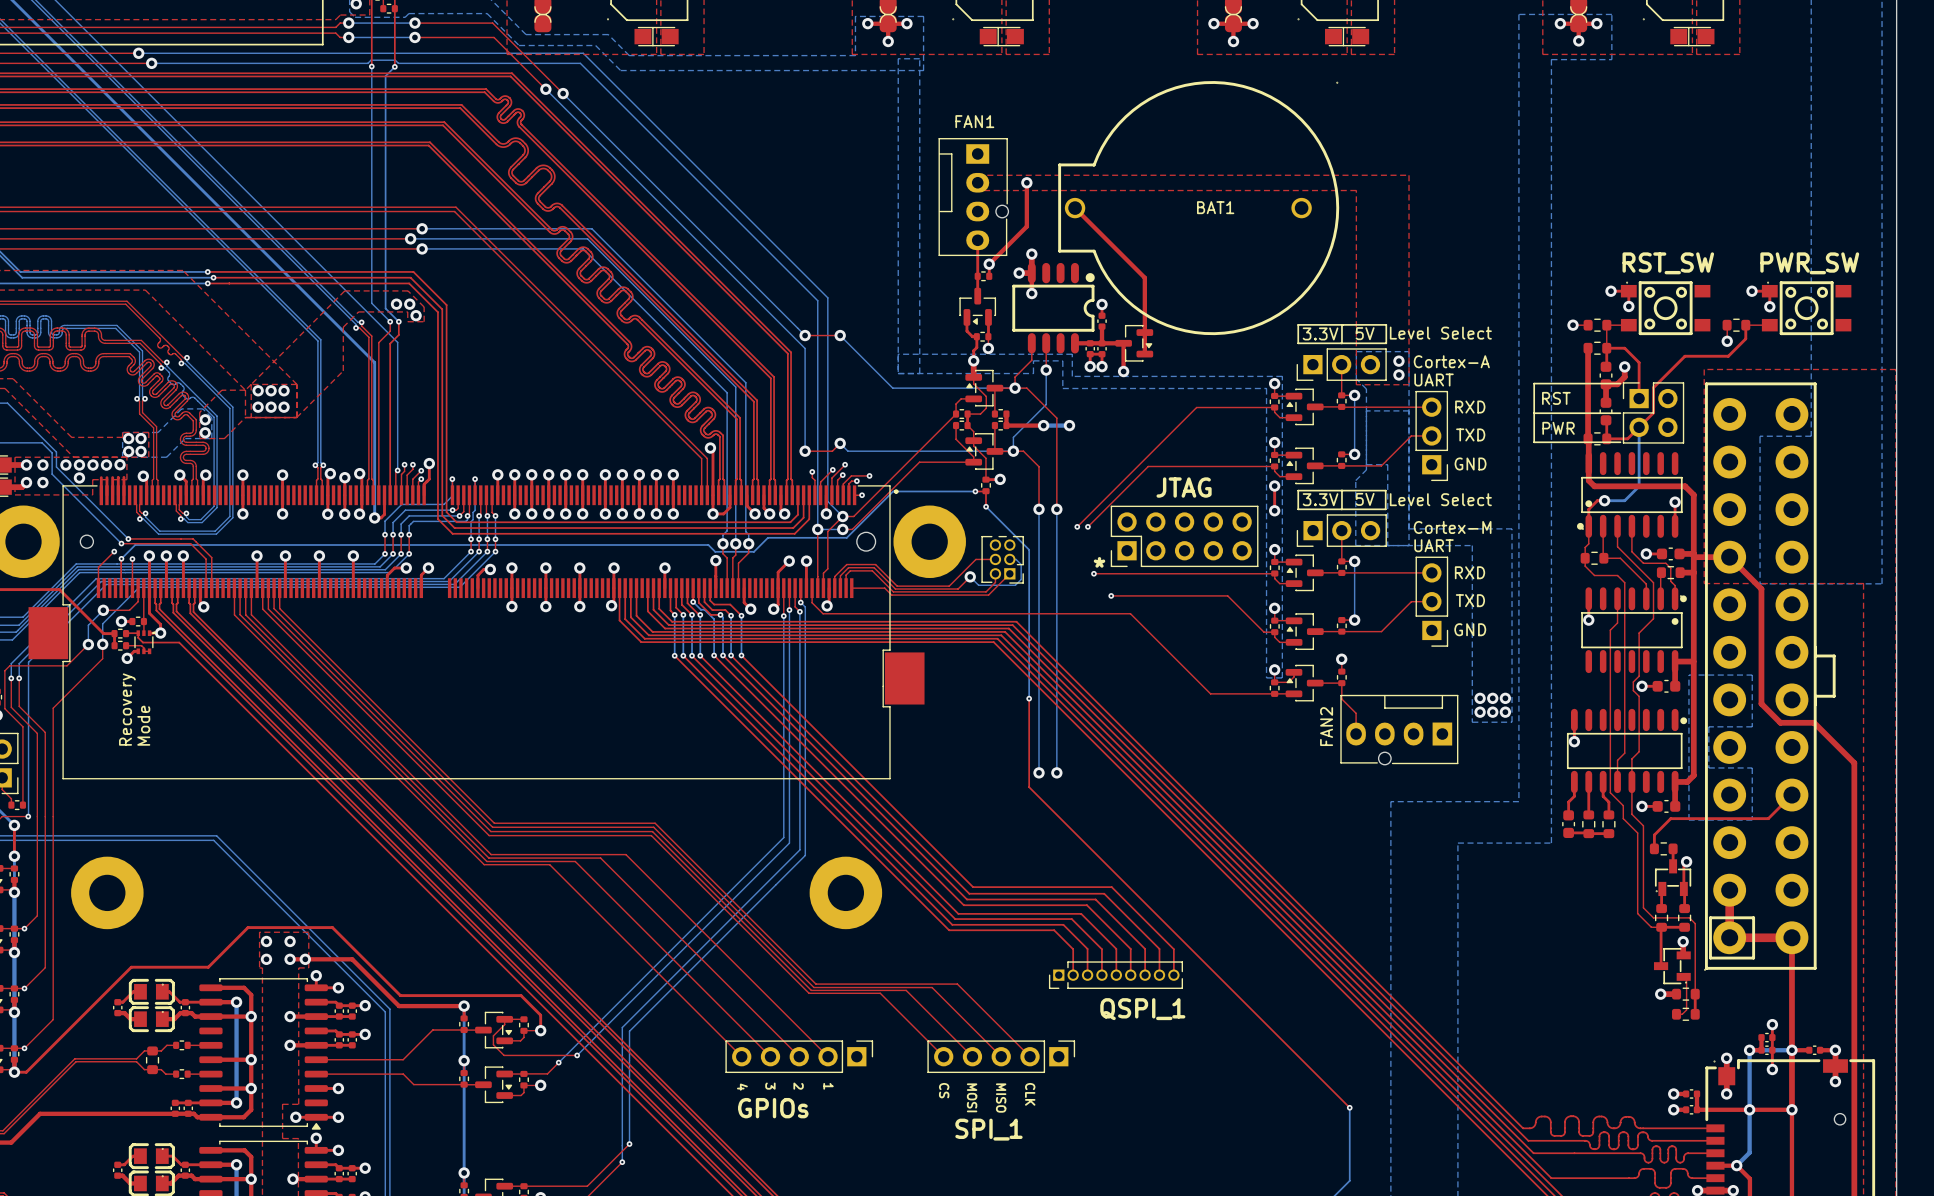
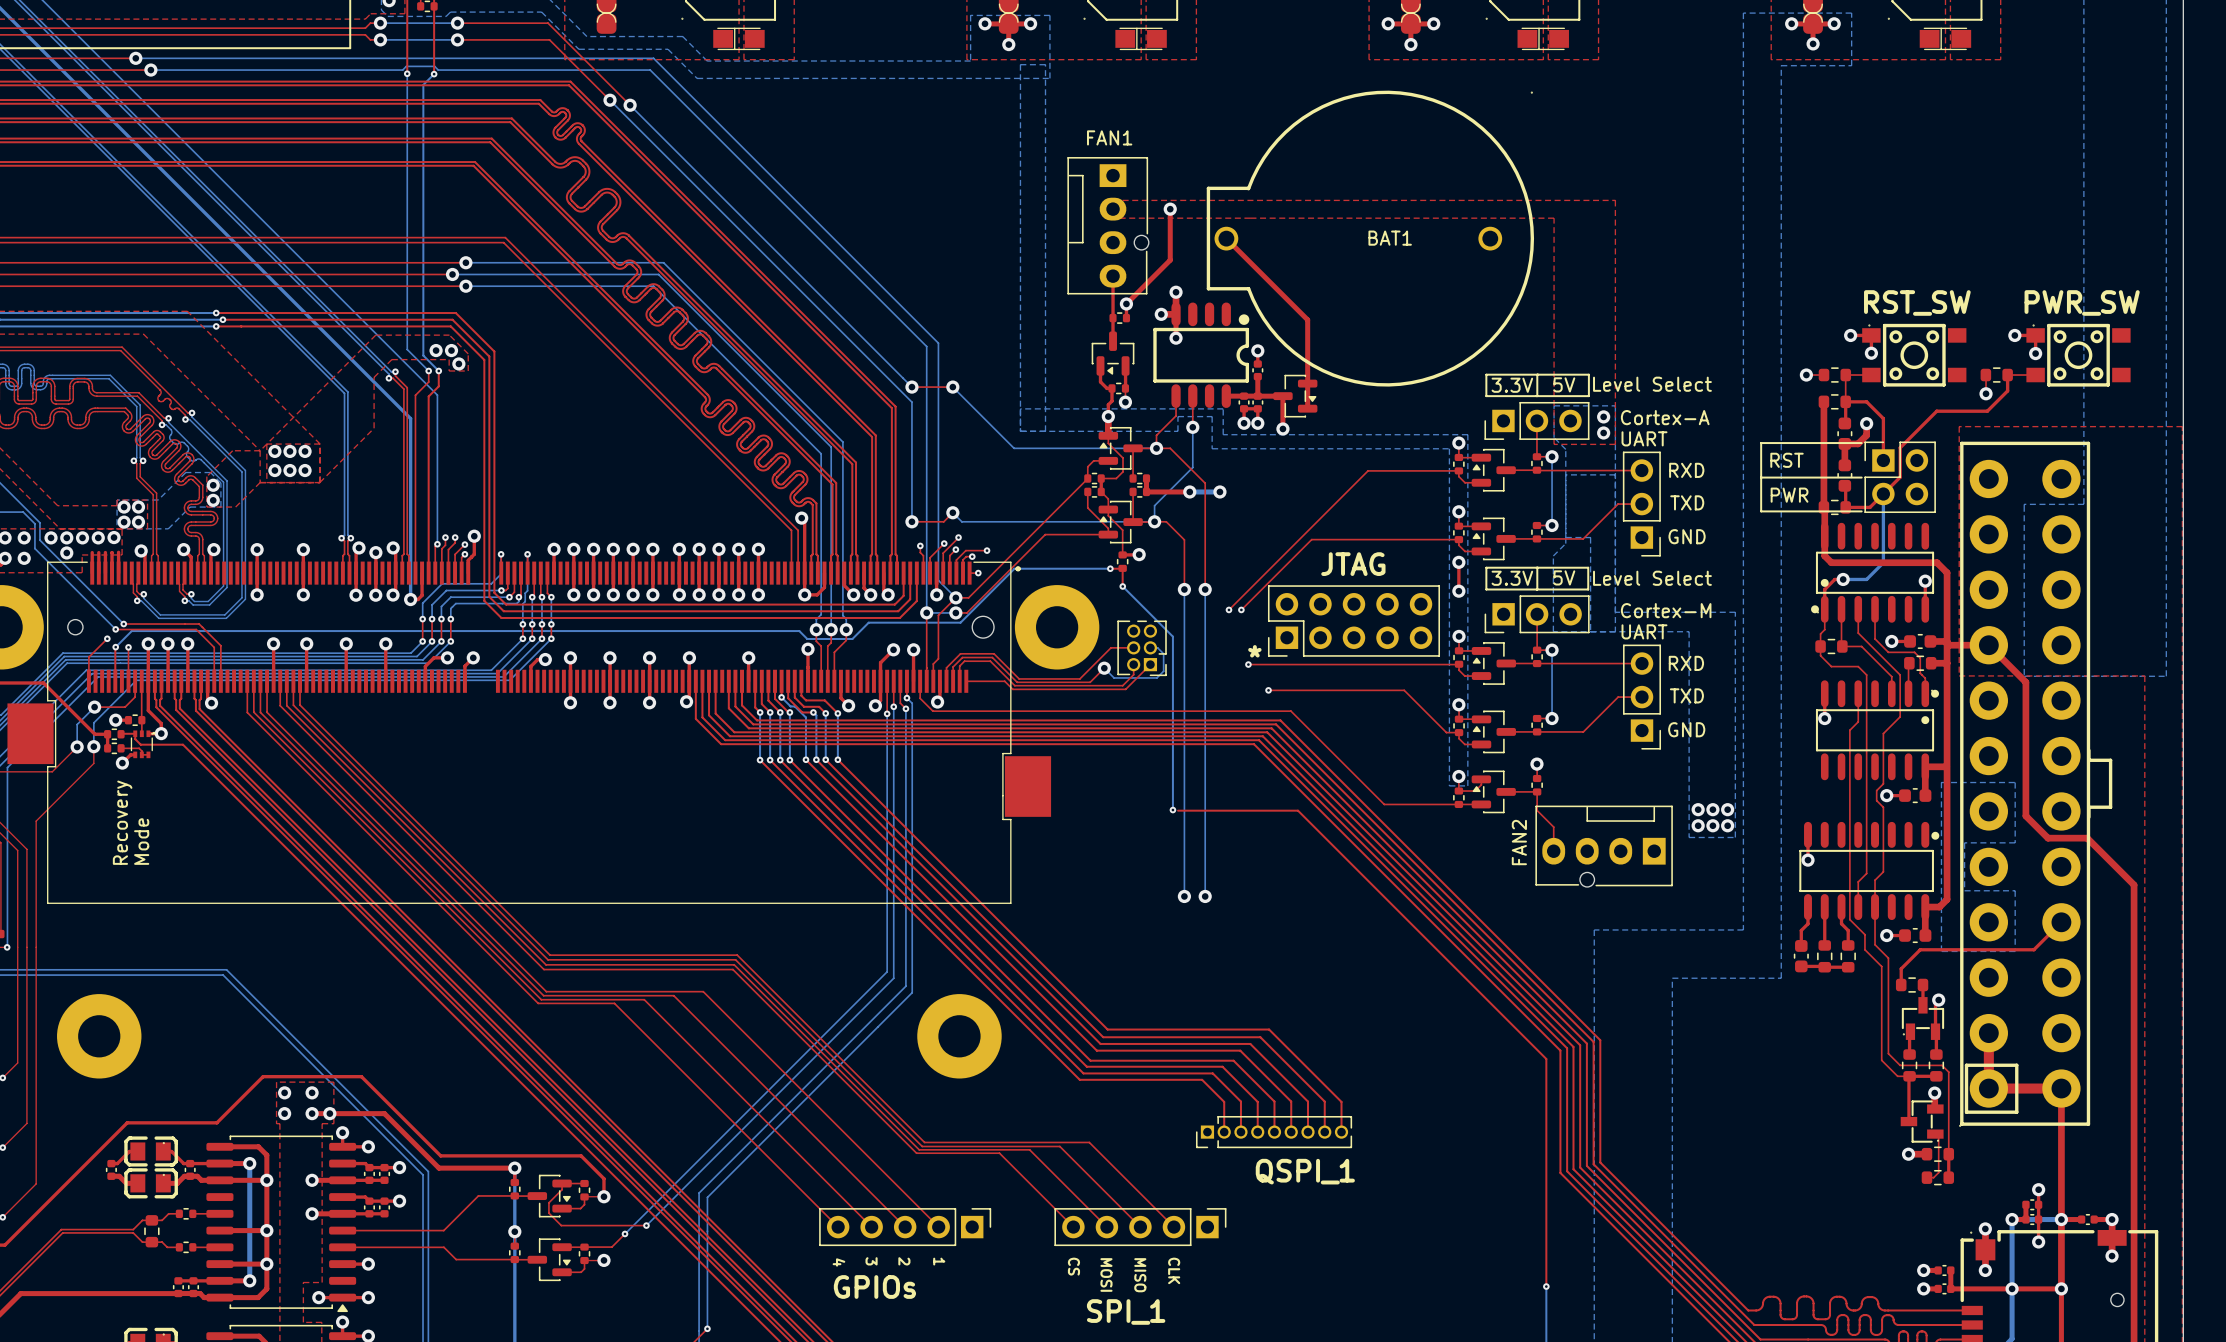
top track: (1016, 621) (1396, 1001) -> (1158, 720) (1280, 720) (1600, 1040) (1600, 1162)
top track: (1012, 625) (1390, 1002) -> (1153, 724) (1276, 724) (1593, 1041) (1593, 1164)
top track: (1008, 628) (1384, 1004) -> (1149, 728) (1271, 728) (1586, 1043) (1586, 1165)
top track: (1005, 631) (1378, 1005) -> (1144, 732) (1267, 732) (1580, 1045) (1580, 1167)
top track: (1001, 635) (1373, 1007) -> (1140, 736) (1262, 736) (1573, 1046) (1573, 1169)
top track: (997, 638) (1367, 1008) -> (1136, 740) (1259, 740) (1567, 1048) (1567, 1171)
top track: (993, 642) (1361, 1010) -> (1131, 744) (1253, 744) (1560, 1050) (1560, 1172)
top track: (1029, 698) (1029, 787) (1349, 1107) -> (1178, 810) (1298, 810) (1546, 1059) (1546, 1286)

